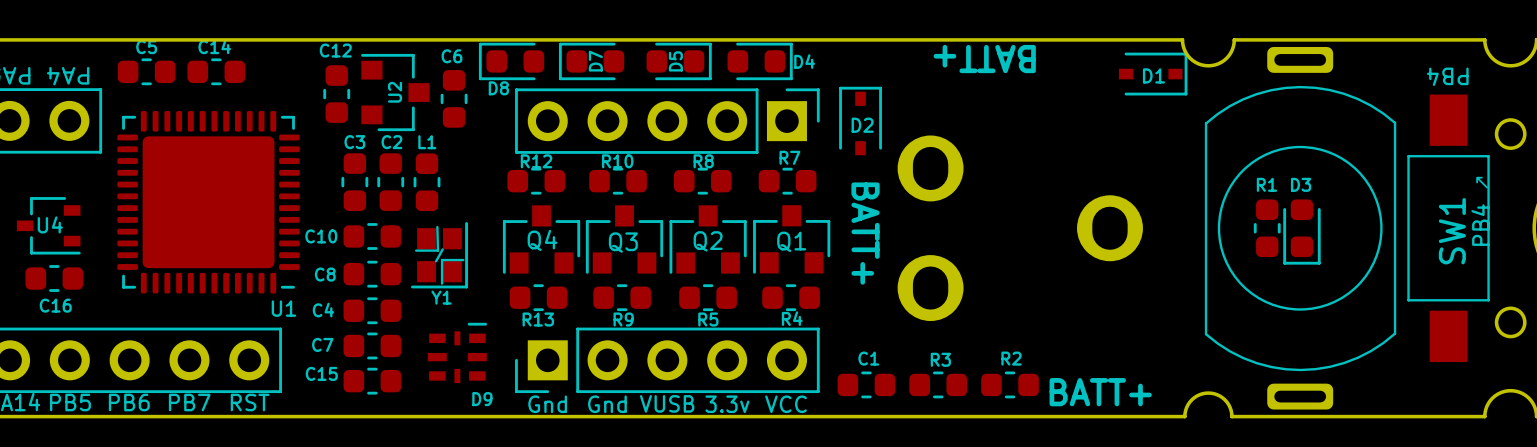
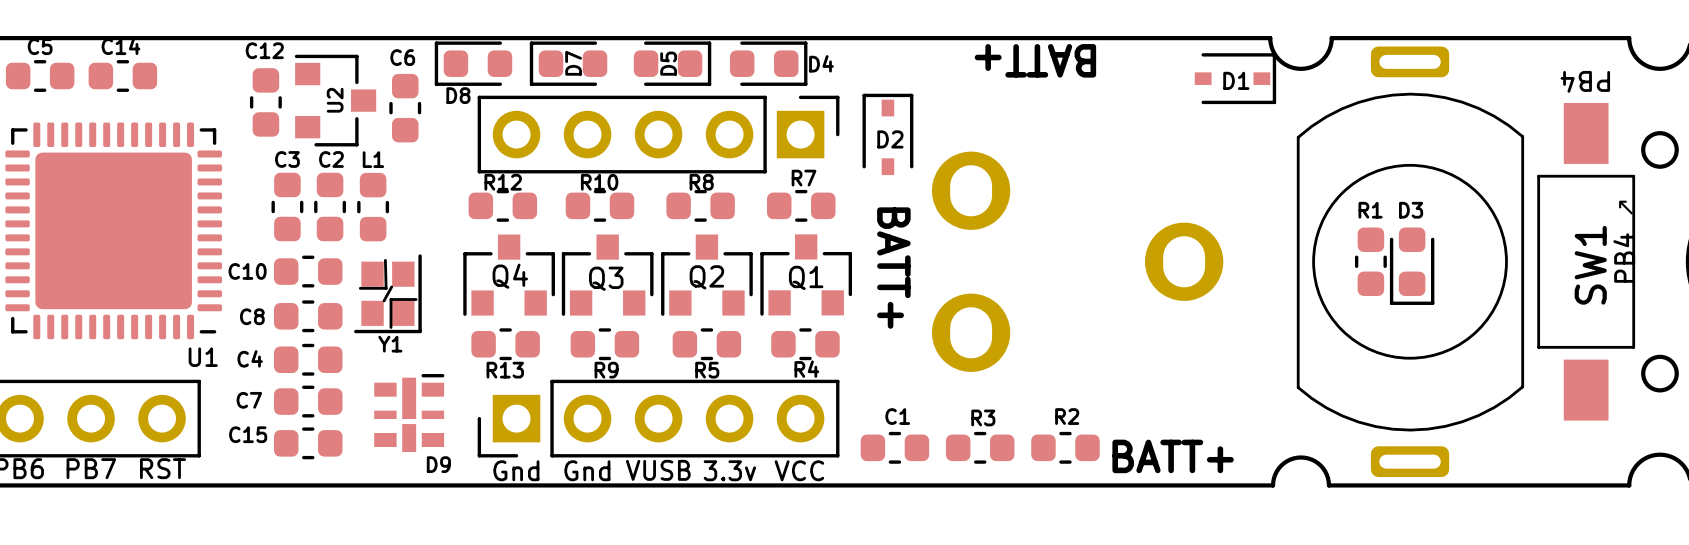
D9 footprint: [427, 322, 488, 384] -> [374, 374, 445, 453]

